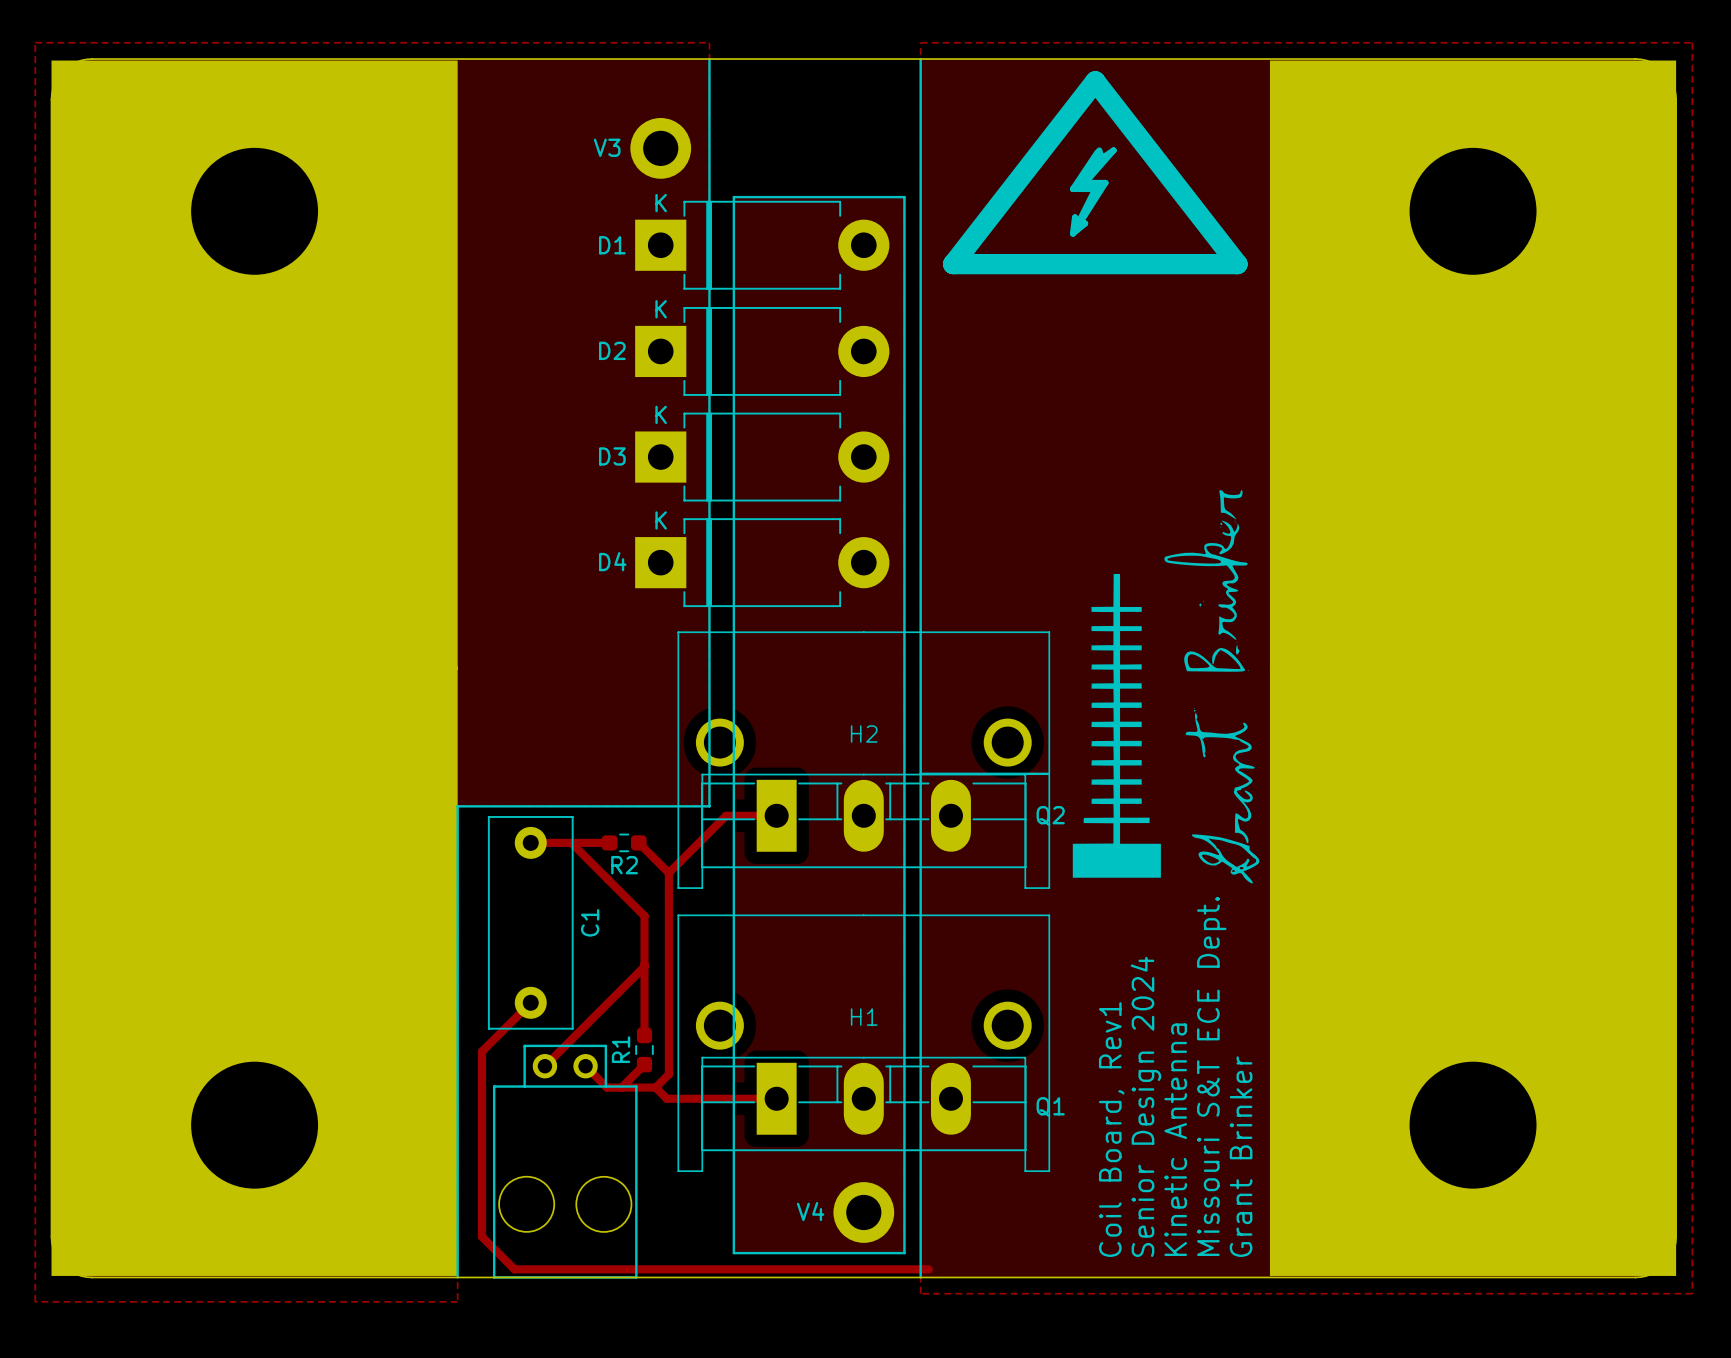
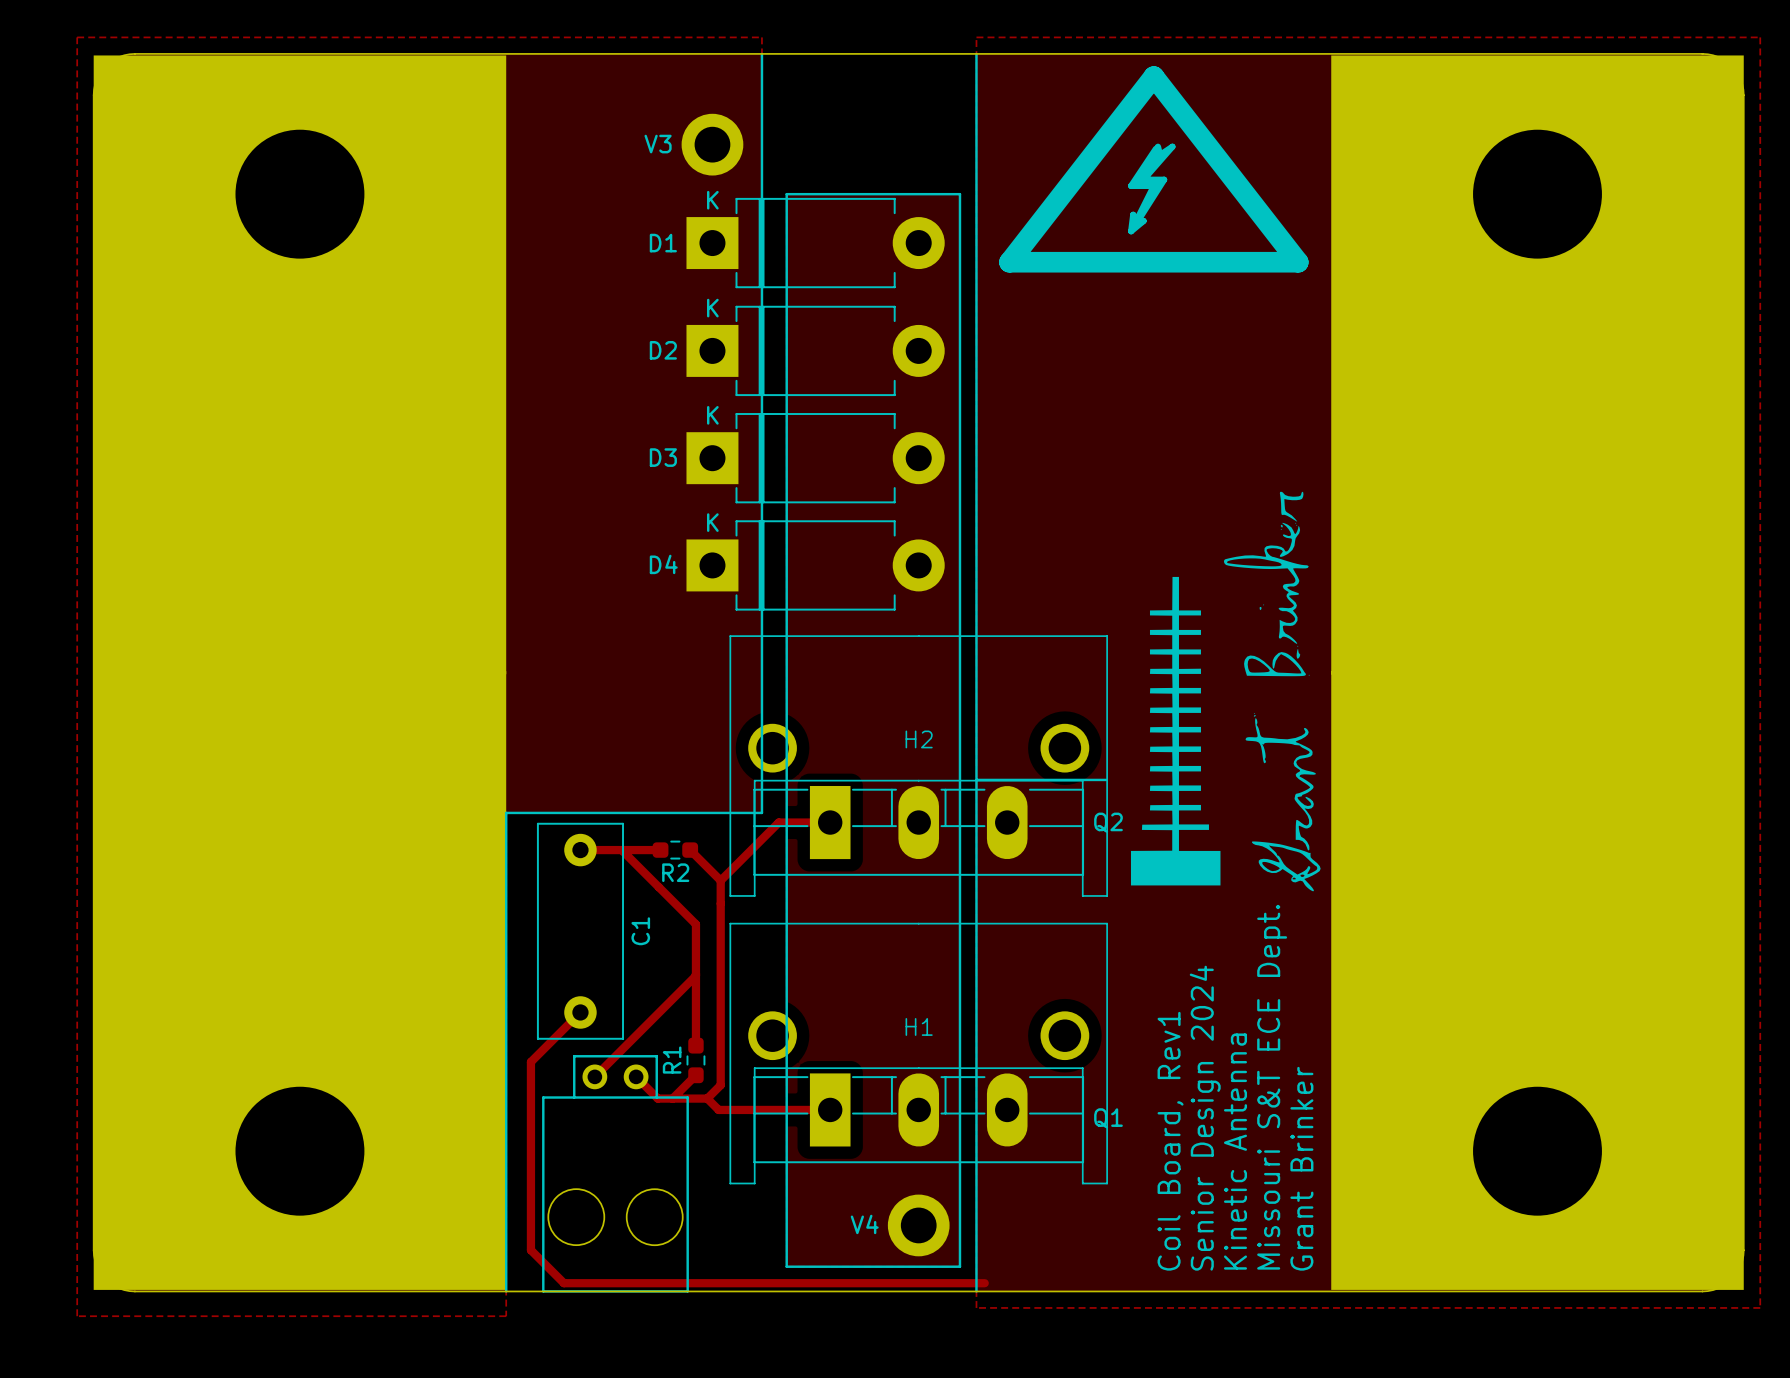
part footprint: [51, 60, 458, 670] -> [93, 55, 507, 675]
part footprint: [1269, 60, 1677, 670] -> [1331, 55, 1744, 675]
part footprint: [51, 666, 458, 1276] -> [93, 671, 507, 1290]
part footprint: [1269, 666, 1677, 1276] -> [1331, 671, 1744, 1290]

